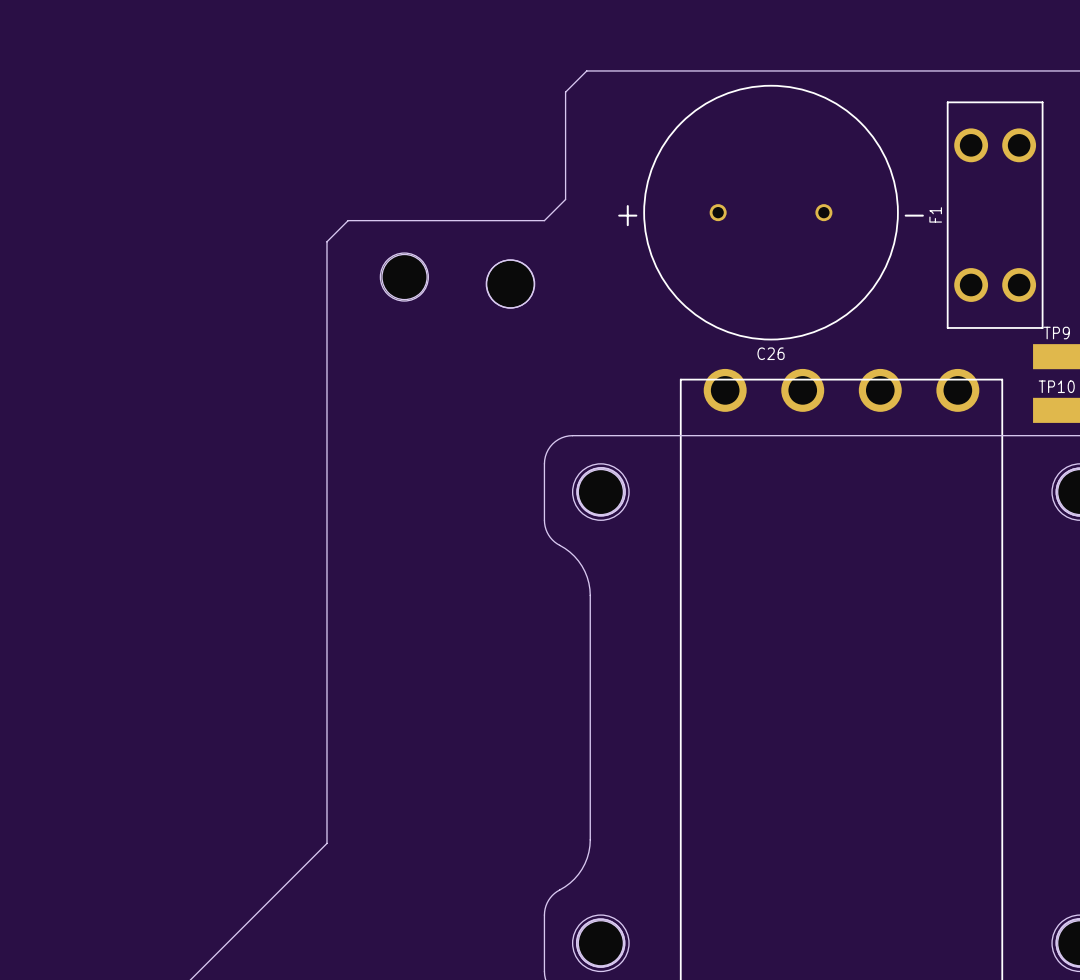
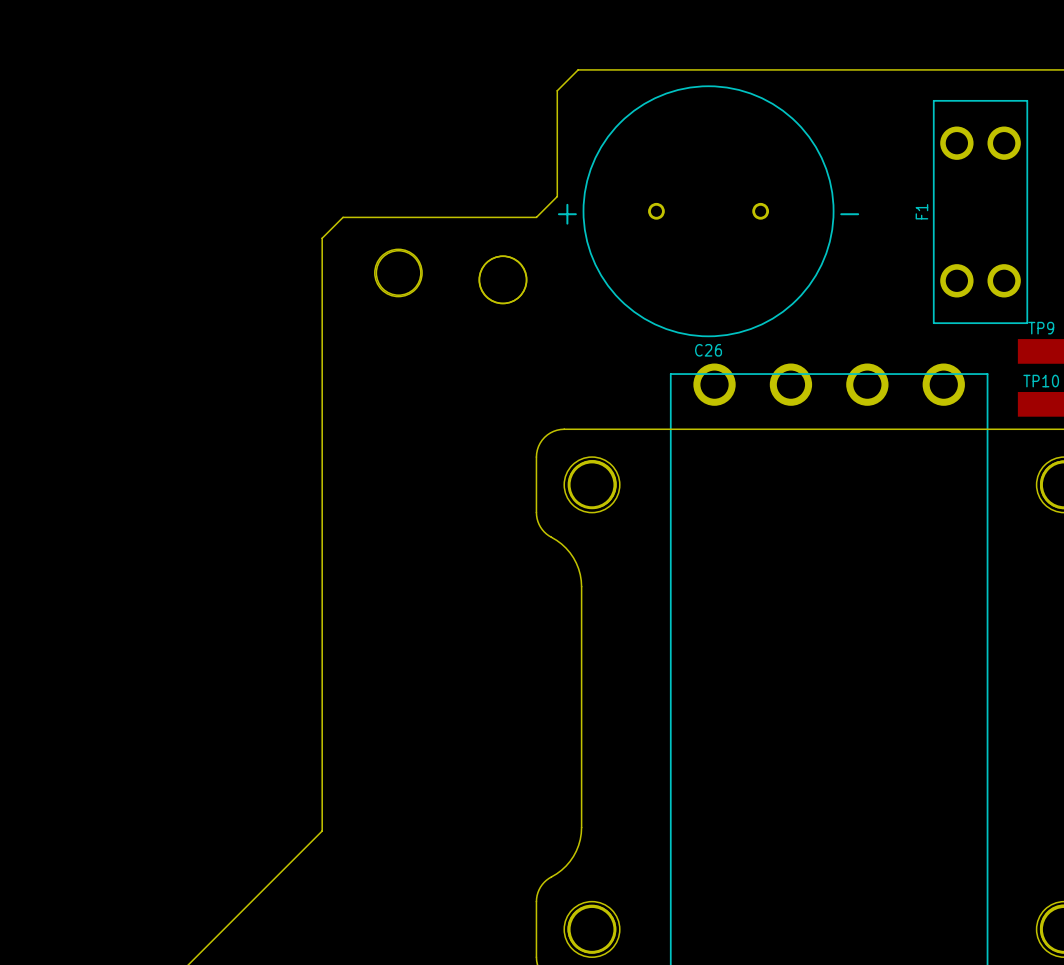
C26 position: (771, 212) -> (708, 211)

